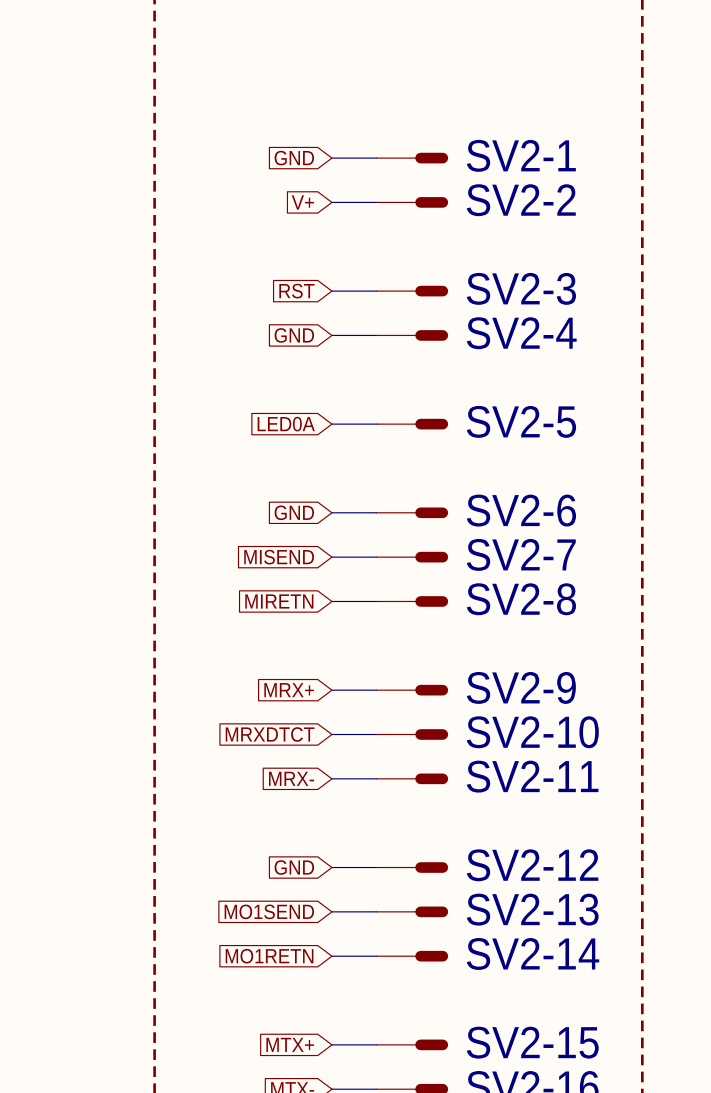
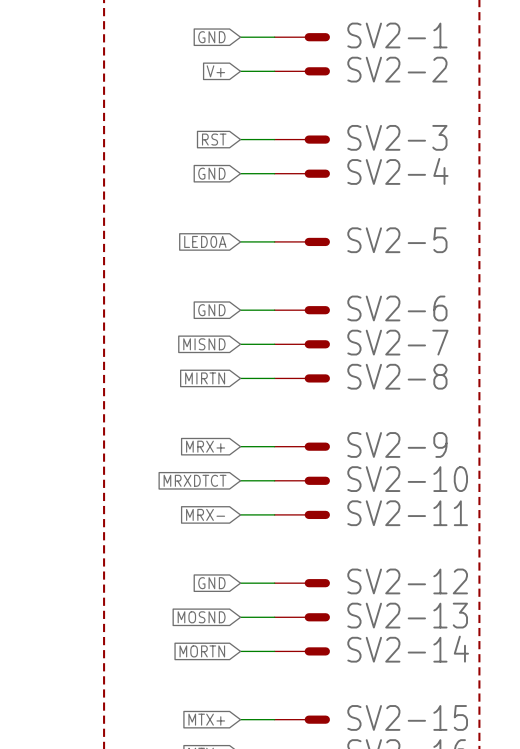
global label: MISEND (279, 557) -> MISND (204, 344)
global label: MIRETN (279, 601) -> MIRTN (205, 378)
global label: MO1SEND (269, 911) -> MOSND (201, 617)
global label: MO1RETN (269, 956) -> MORTN (202, 651)

